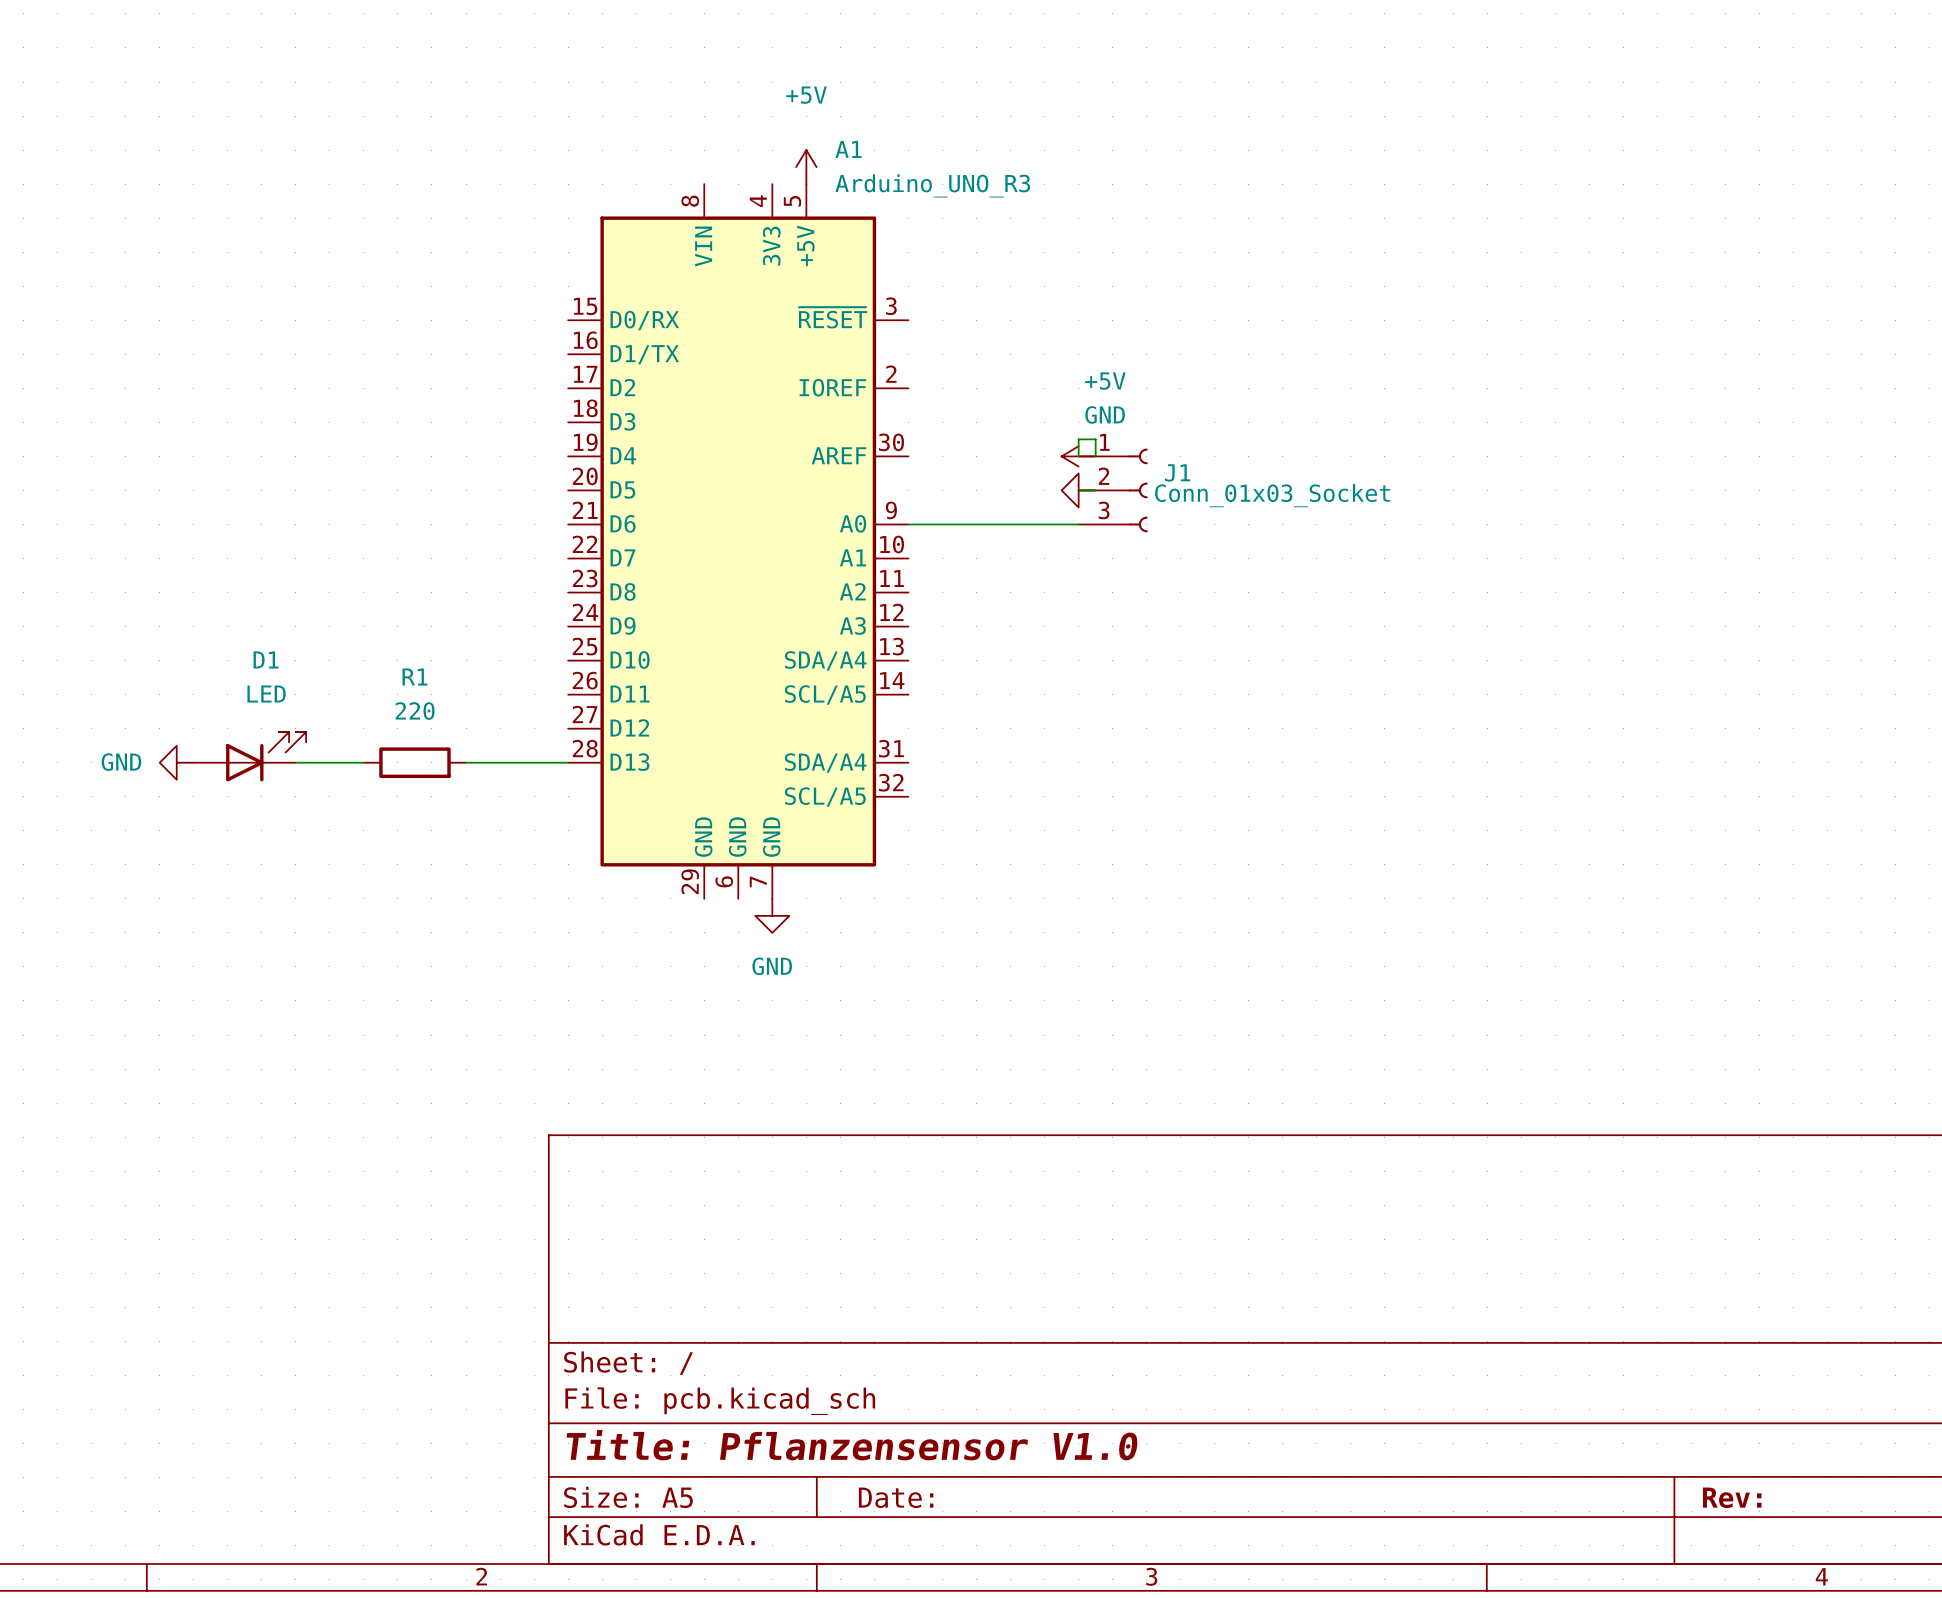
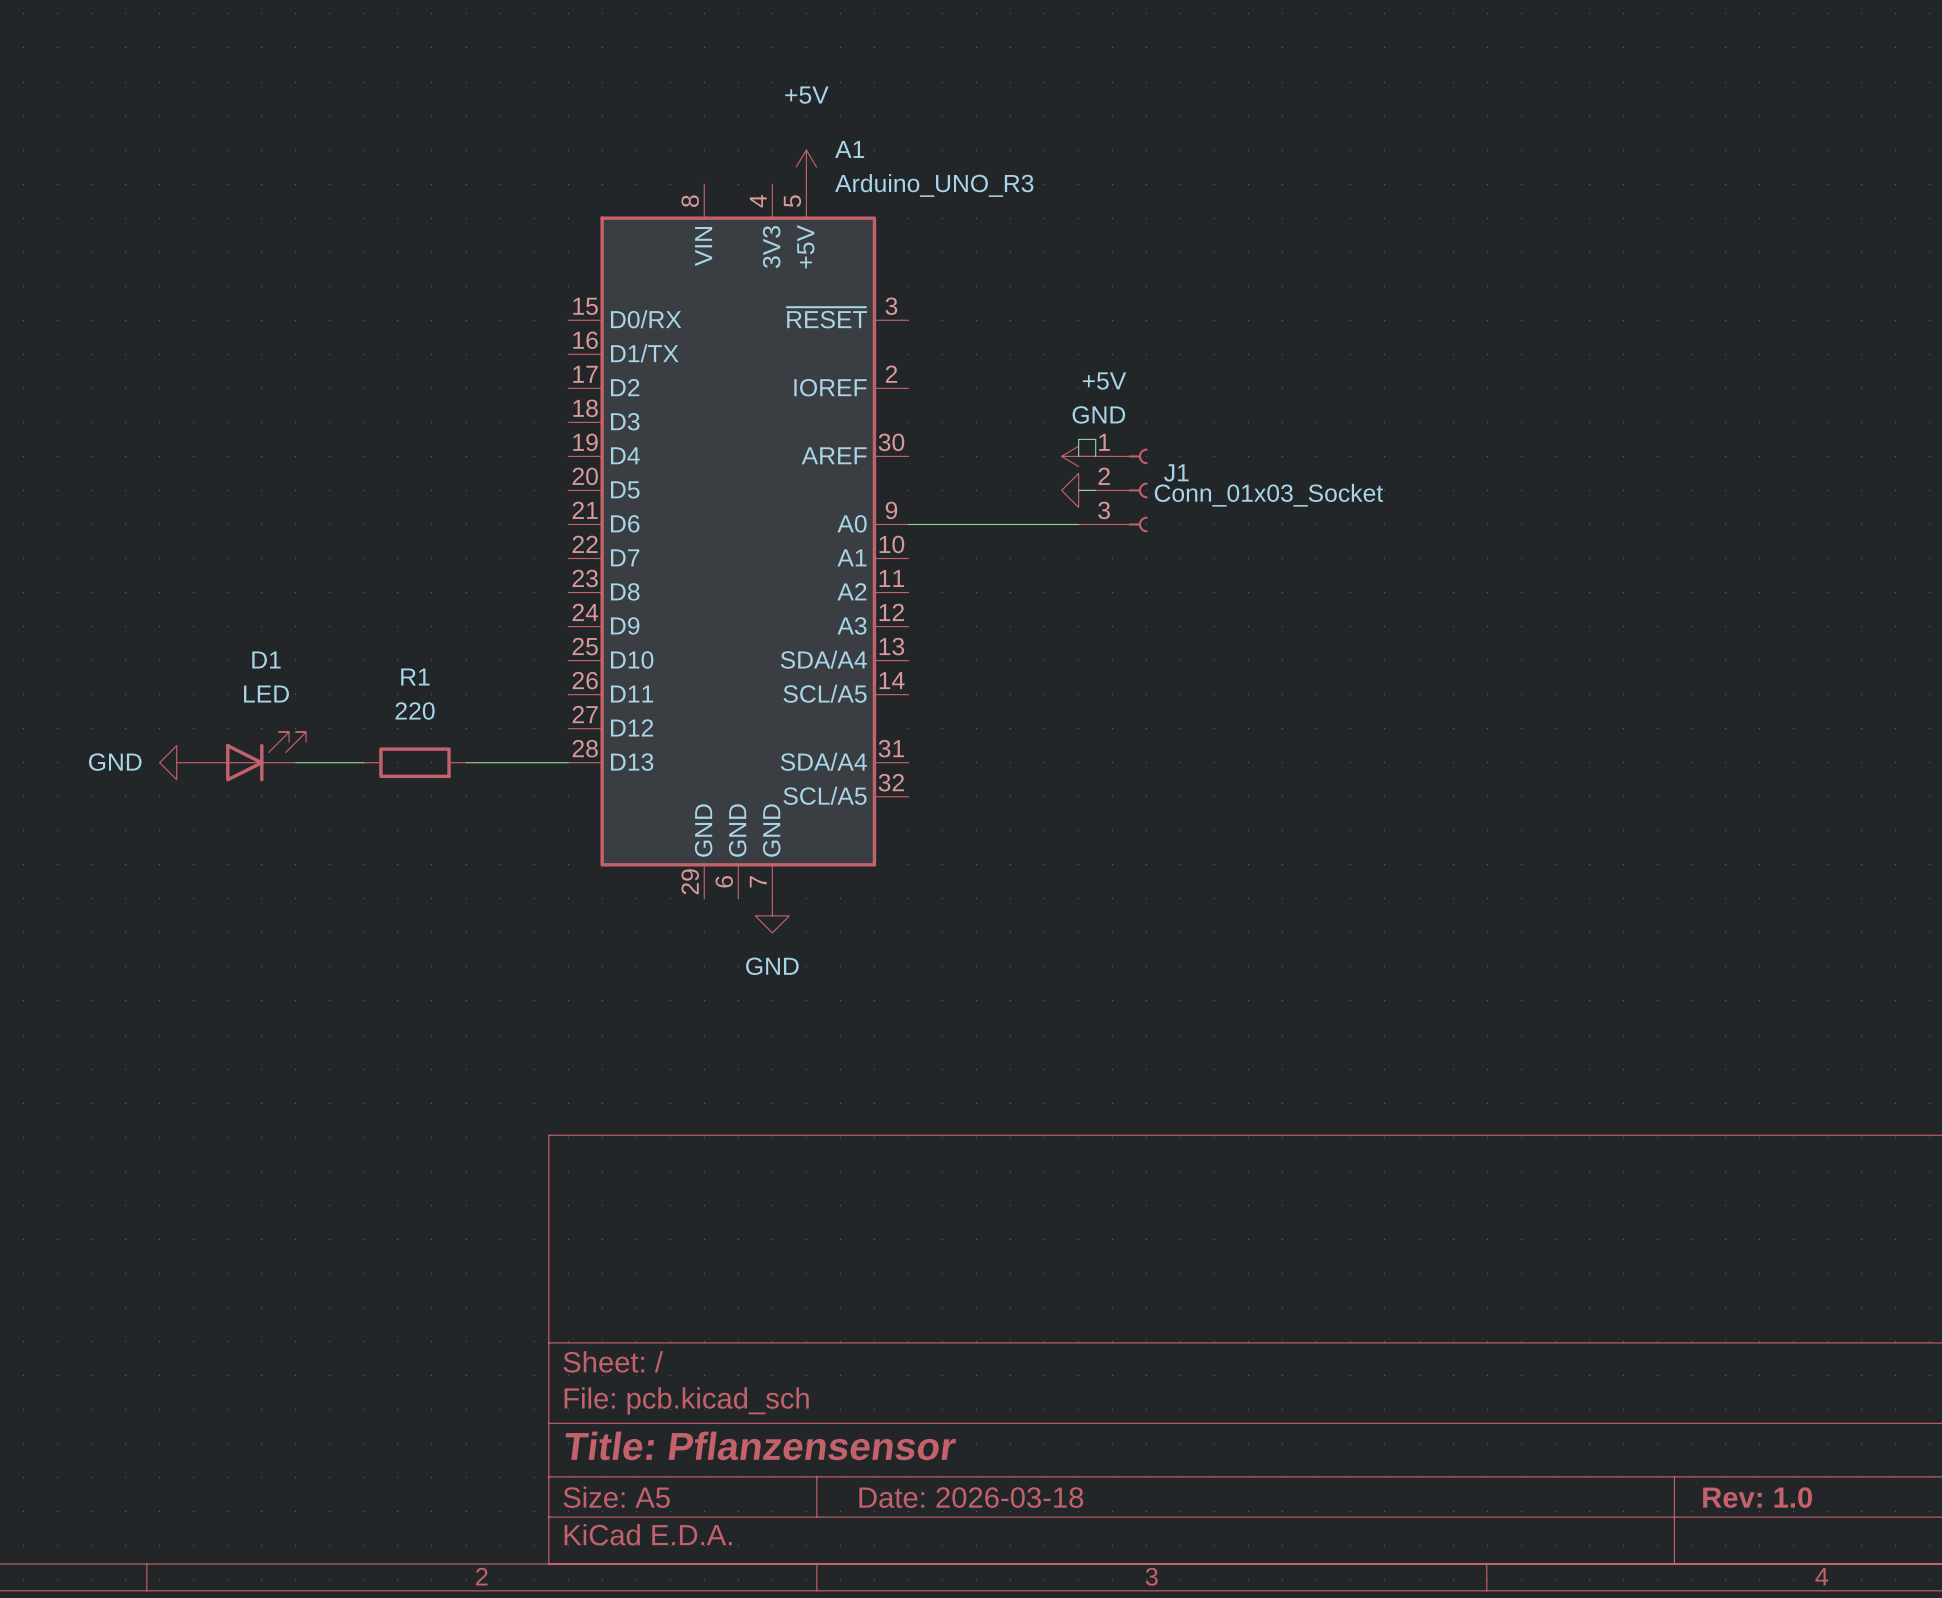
title block: Title: Pflanzensensor V1.0 (852, 1445) -> Title: Pflanzensensor (760, 1445)
title block: Date: (896, 1497) -> Date: 2026-03-18 (971, 1497)
title block: Rev: (1732, 1497) -> Rev: 1.0 (1757, 1497)

